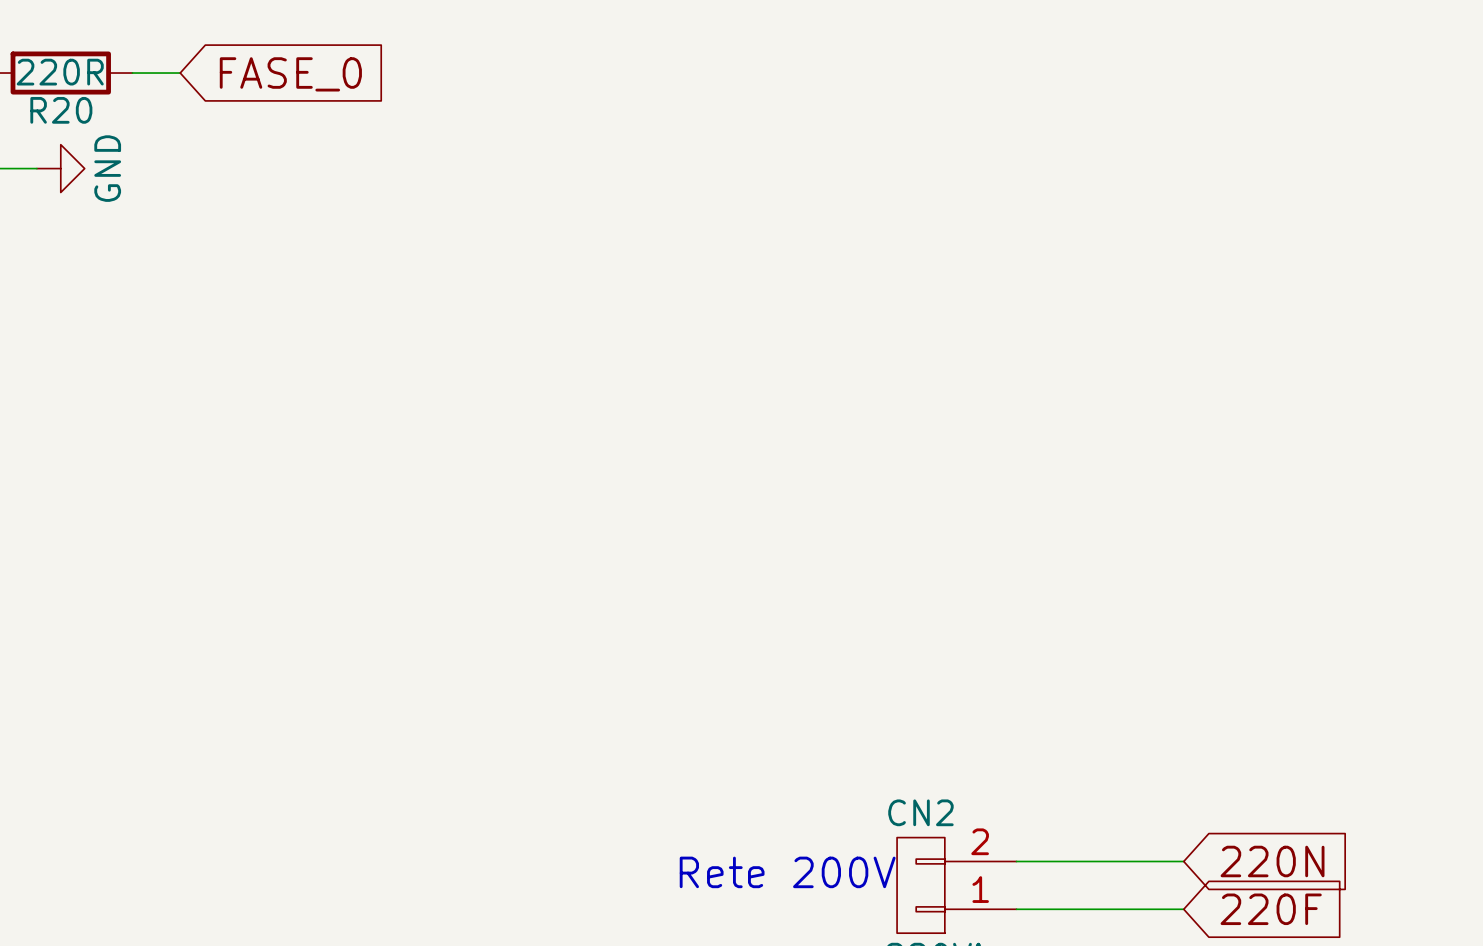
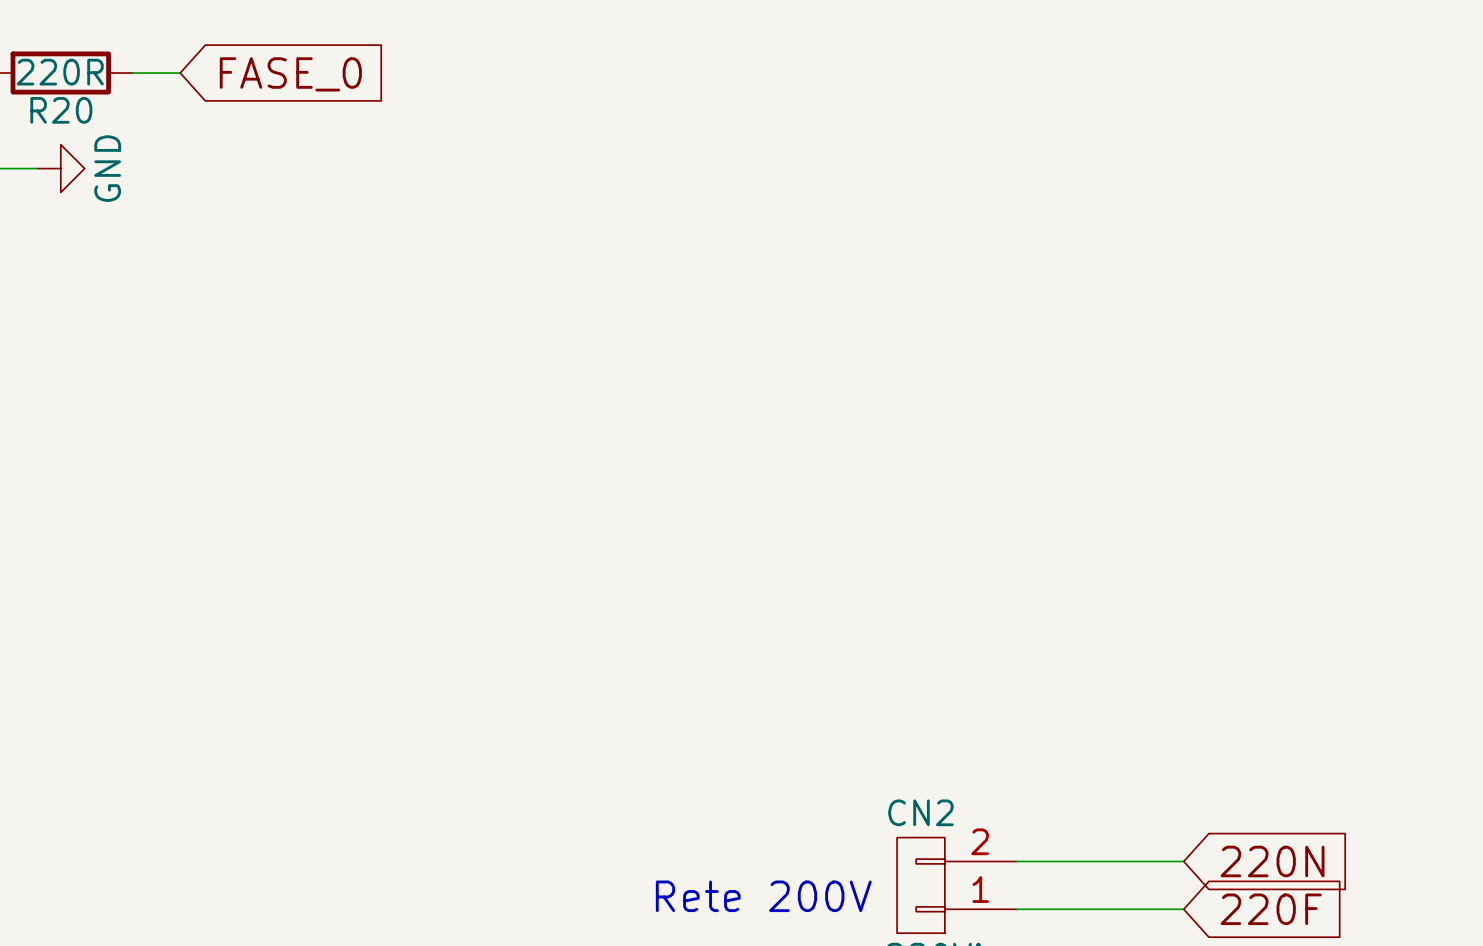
text position: Rete 200V (787, 872) -> Rete 200V (763, 896)

